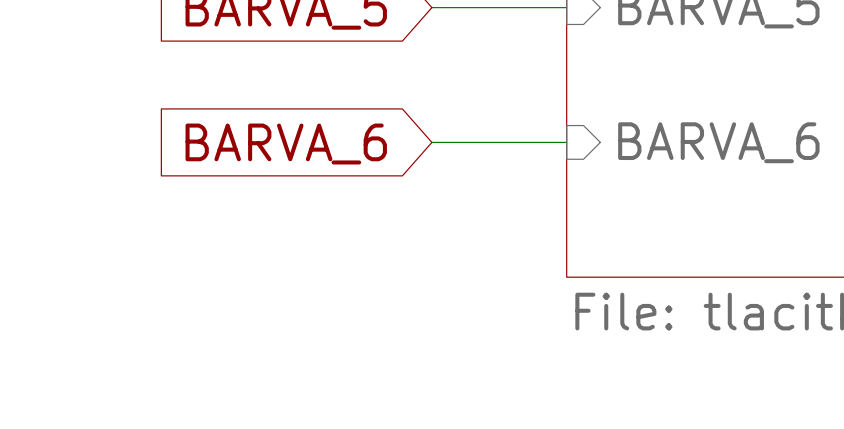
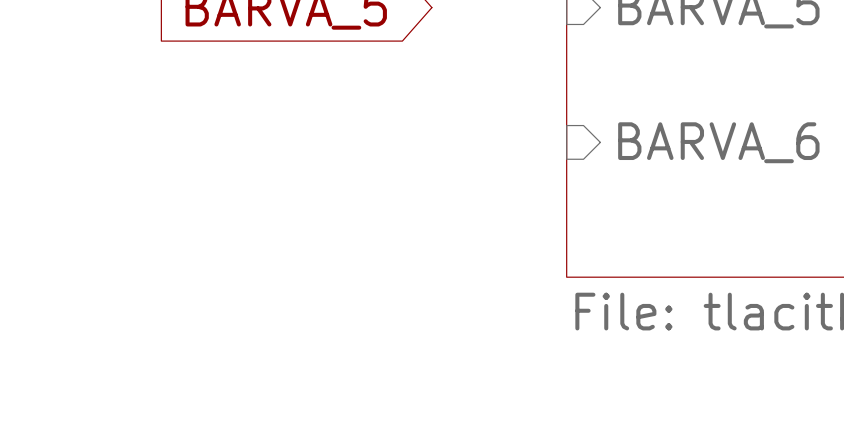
wire: (431, 7) (566, 7) -> none
wire: (431, 142) (566, 142) -> none
global label: BARVA_6 (286, 144) -> none

